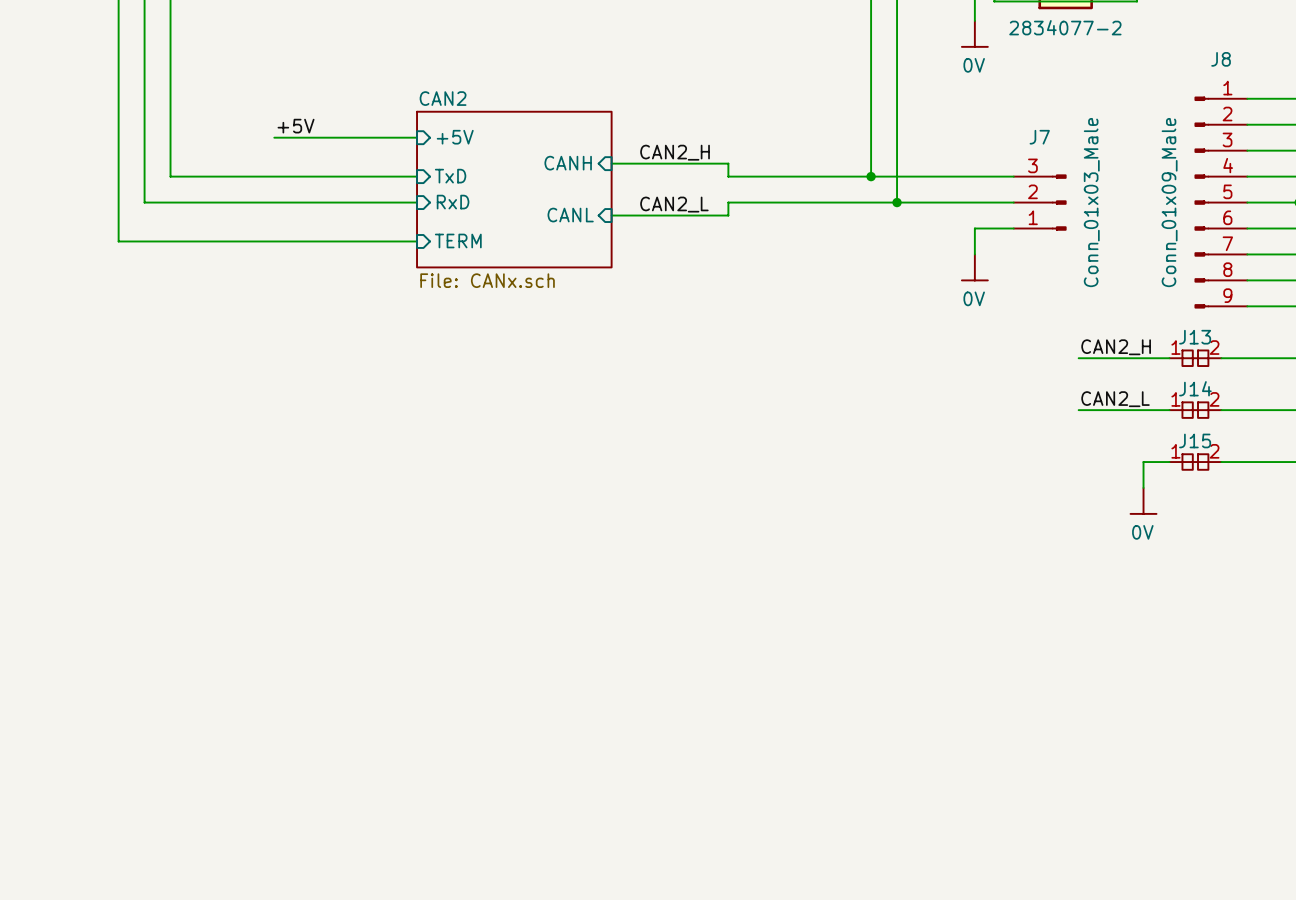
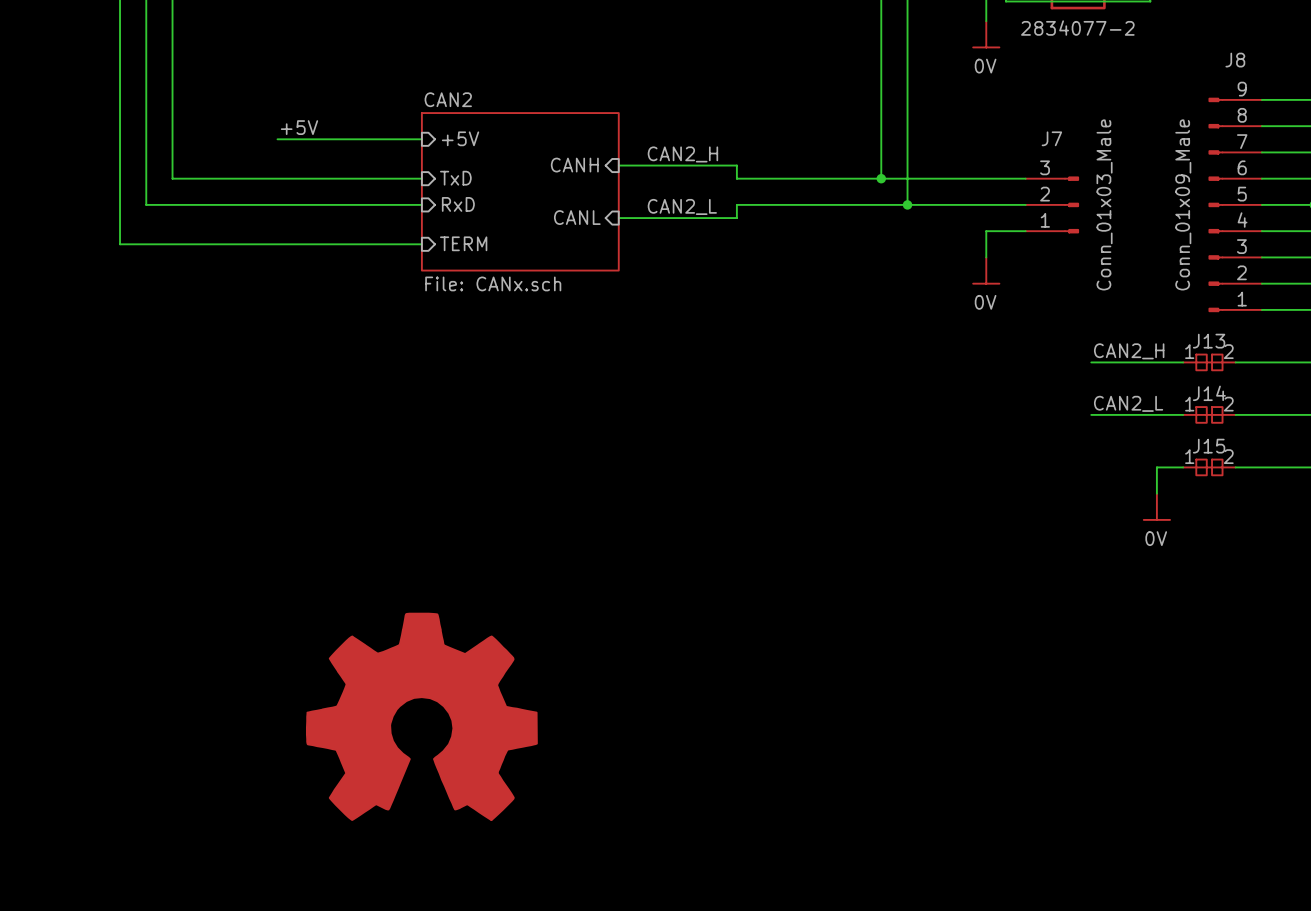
J8 flip: as is (1201, 202) -> up-down (1215, 204)
part: none -> (421, 716)

